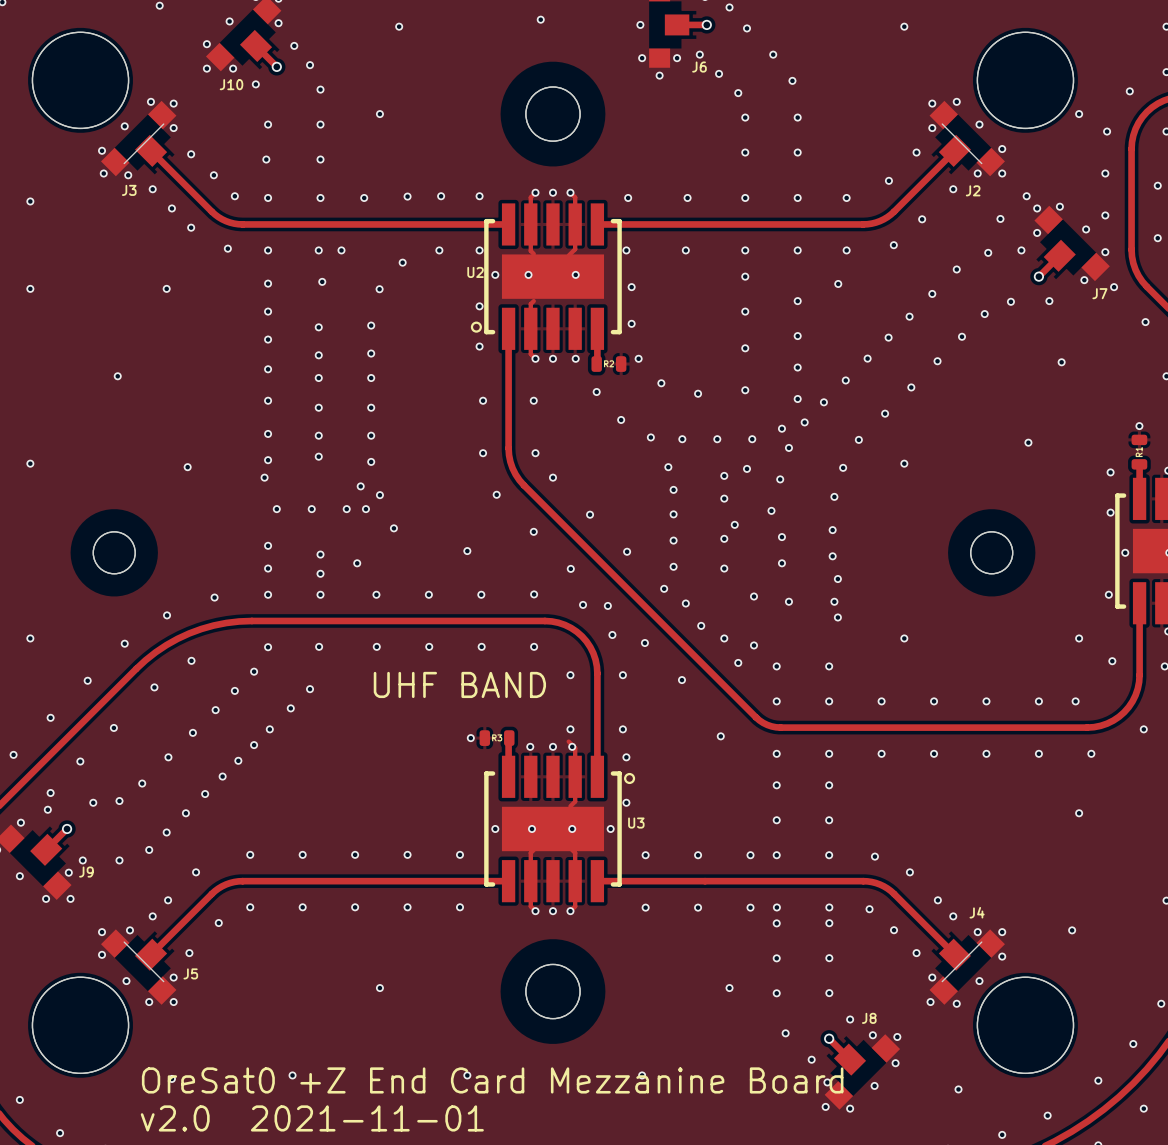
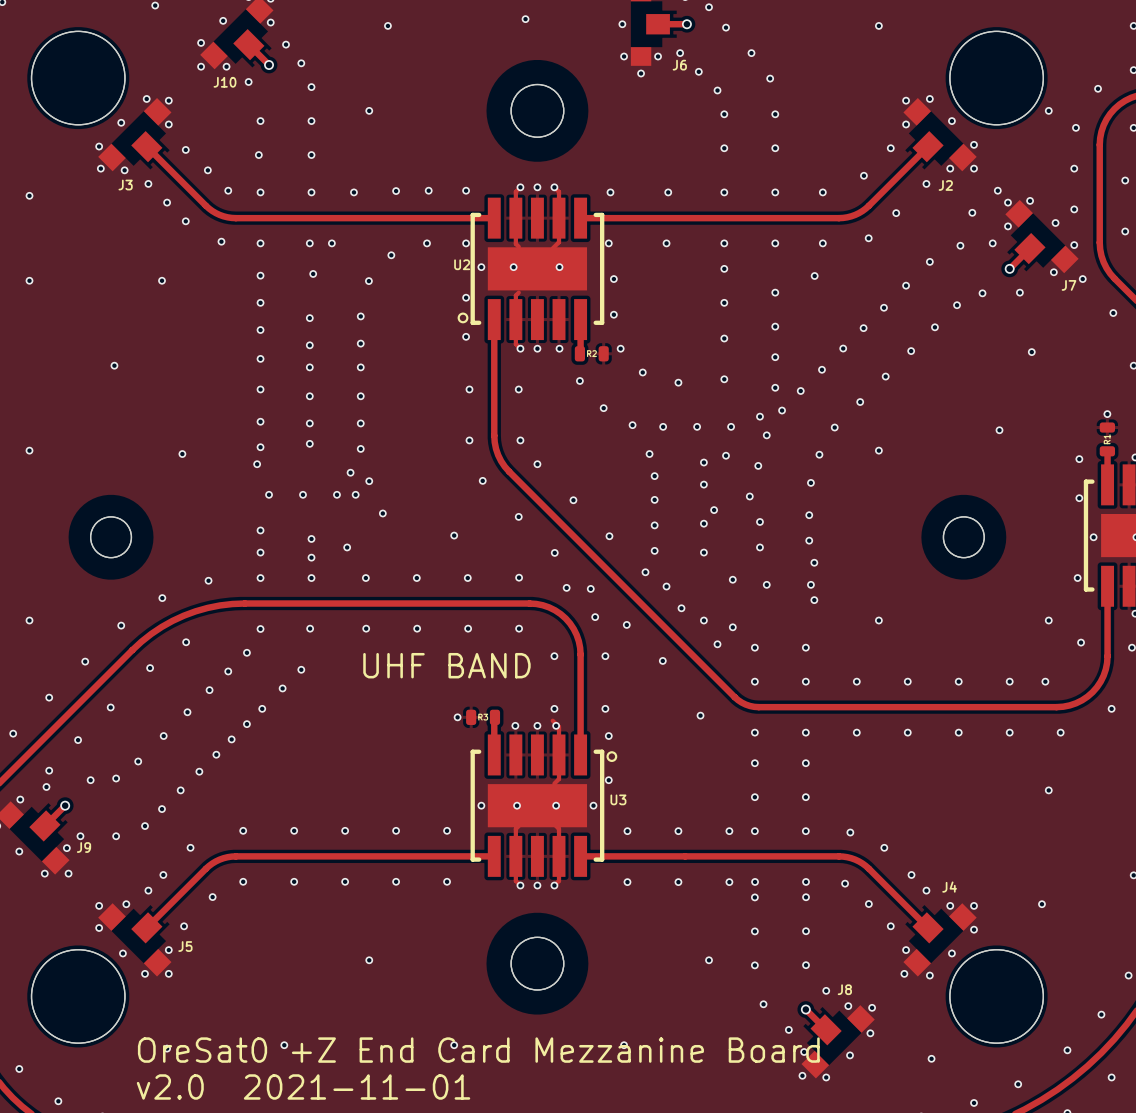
board edge: (163, 124) (124, 163) -> none
board edge: (942, 124) (981, 163) -> none
board edge: (124, 942) (163, 981) -> none
board edge: (981, 942) (942, 981) -> none

